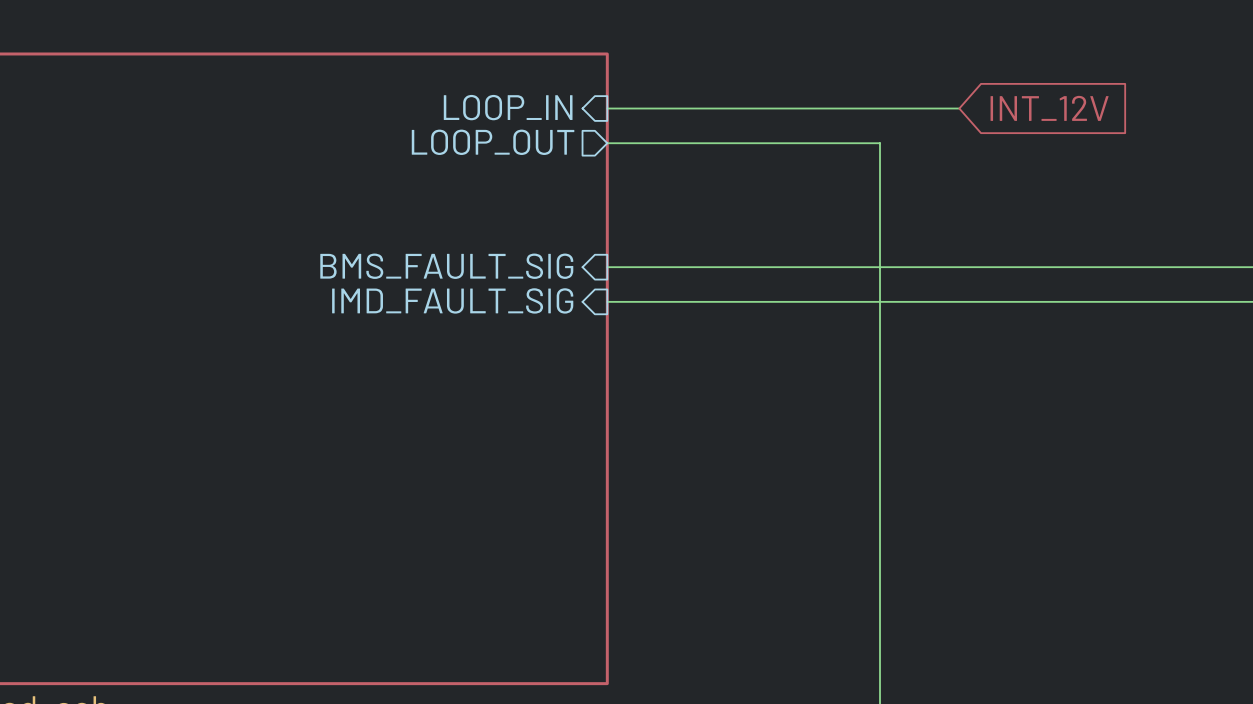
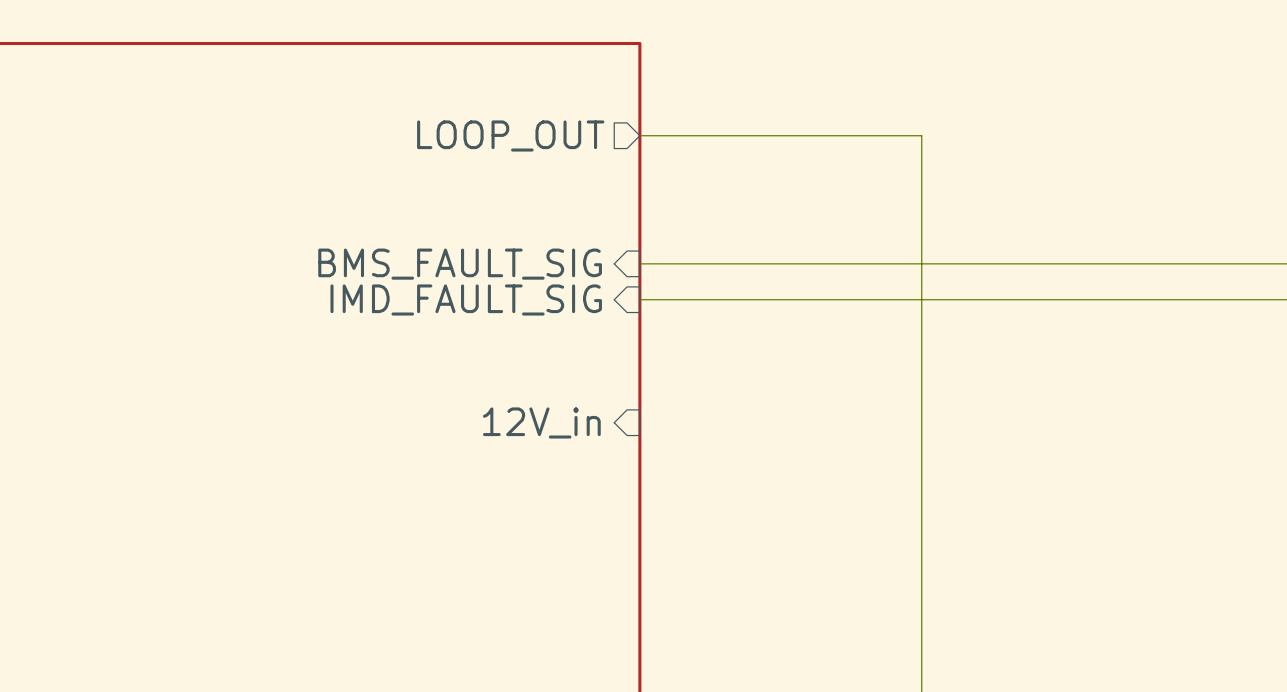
sheet pin: LOOP_IN (508, 107) -> none
wire: (607, 108) (959, 108) -> none
global label: INT_12V (1049, 108) -> none
sheet pin: none -> 12V_in (541, 422)

